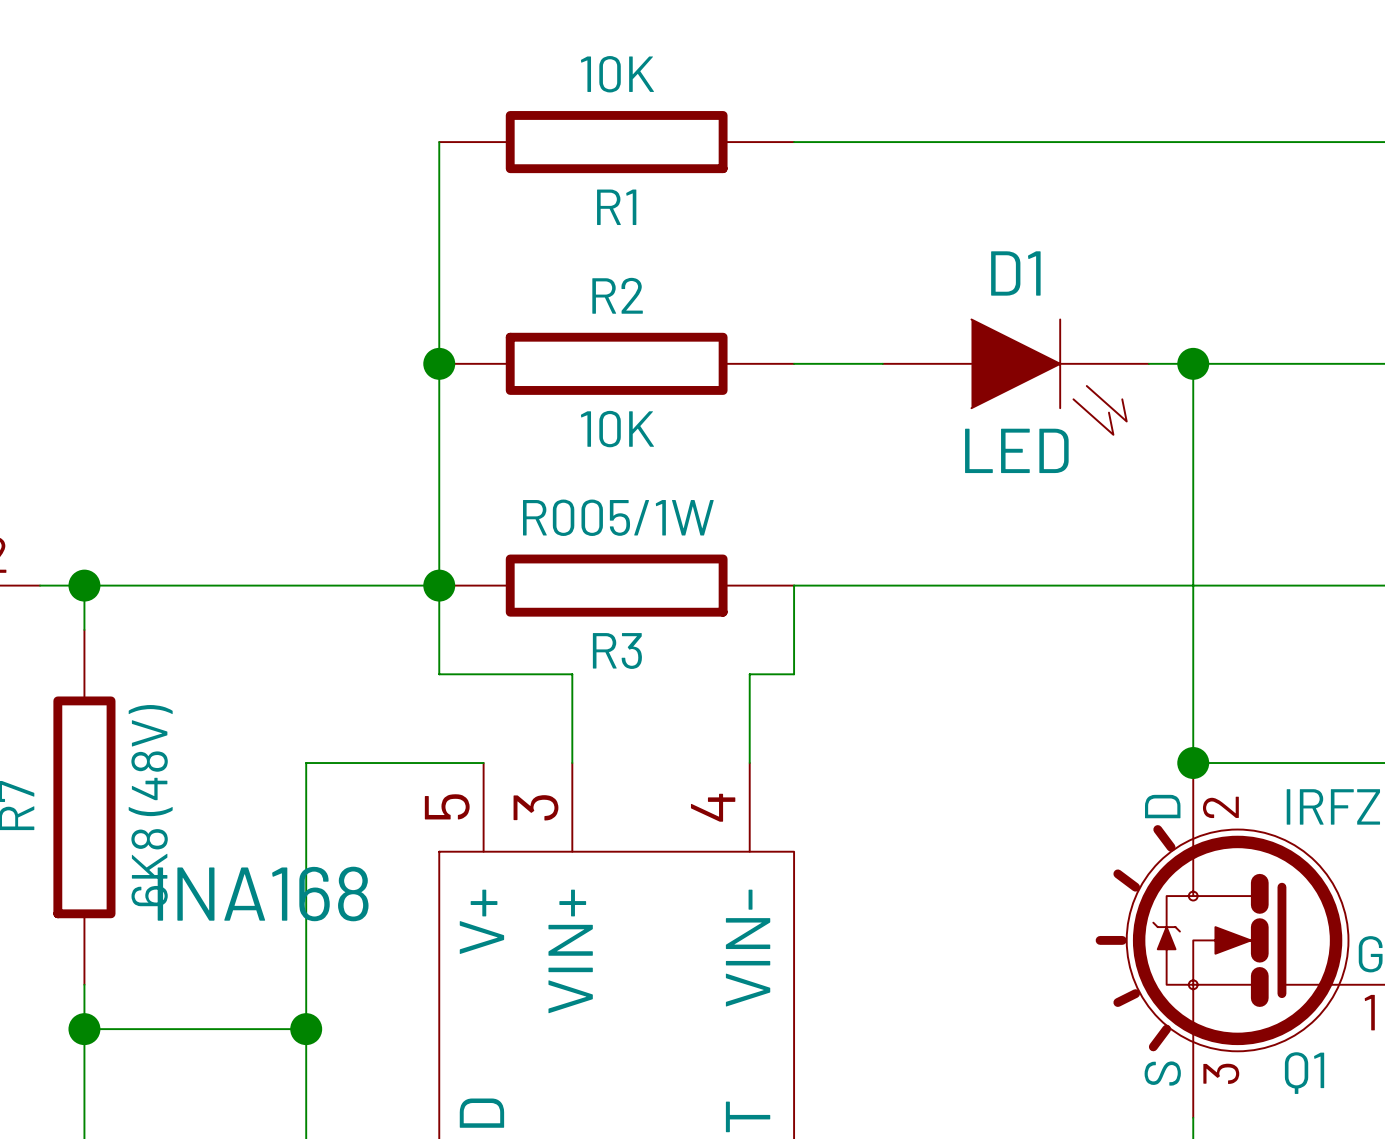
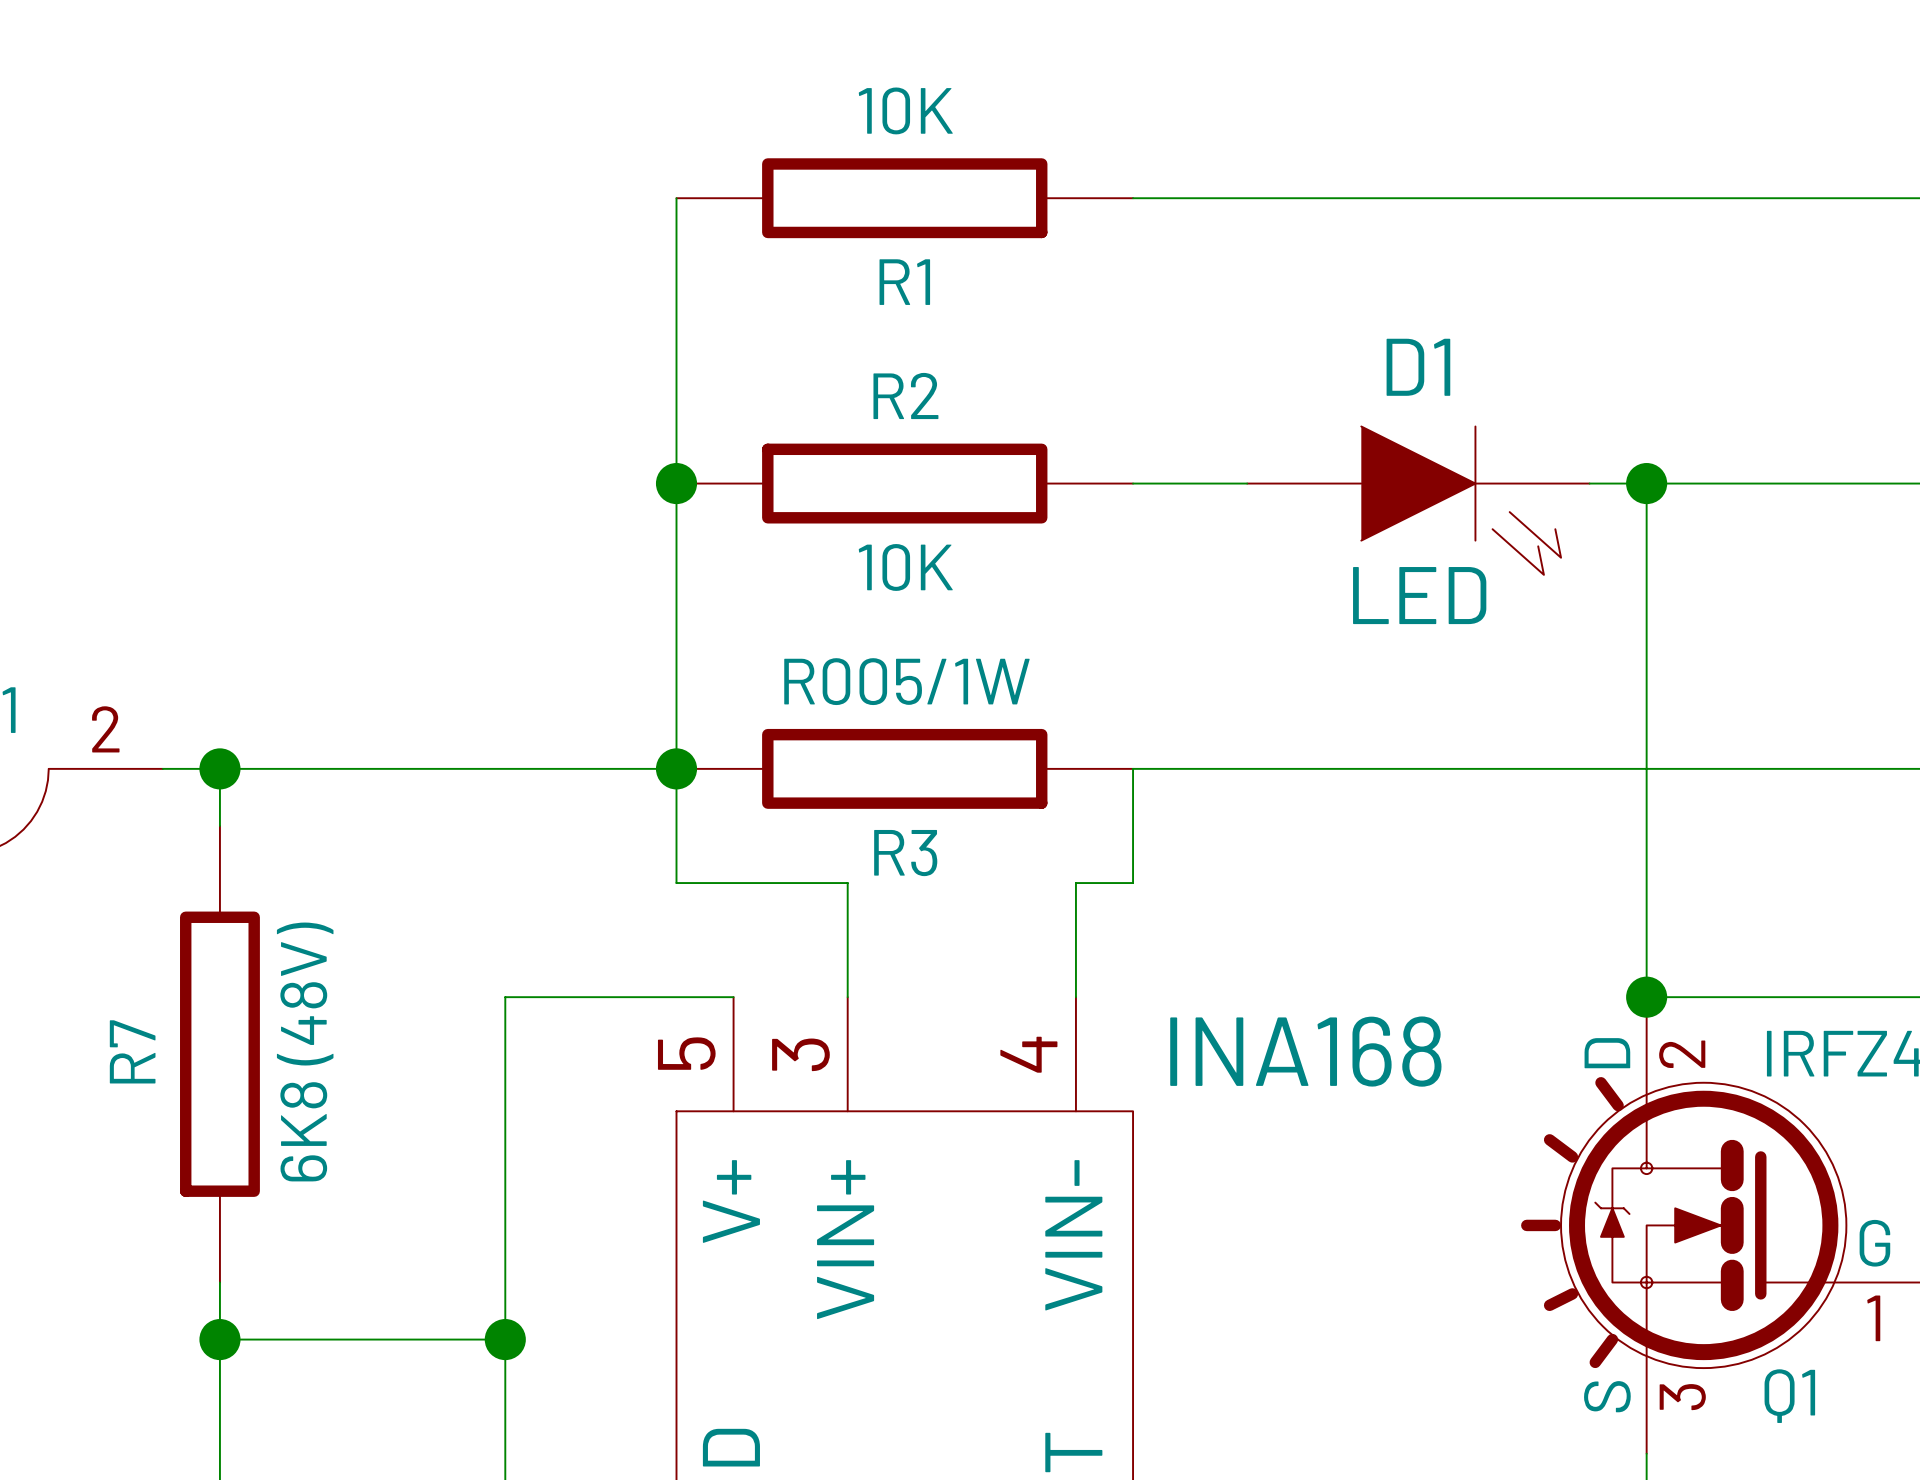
part value position: INA168 (263, 894) -> INA168 (1305, 1051)

